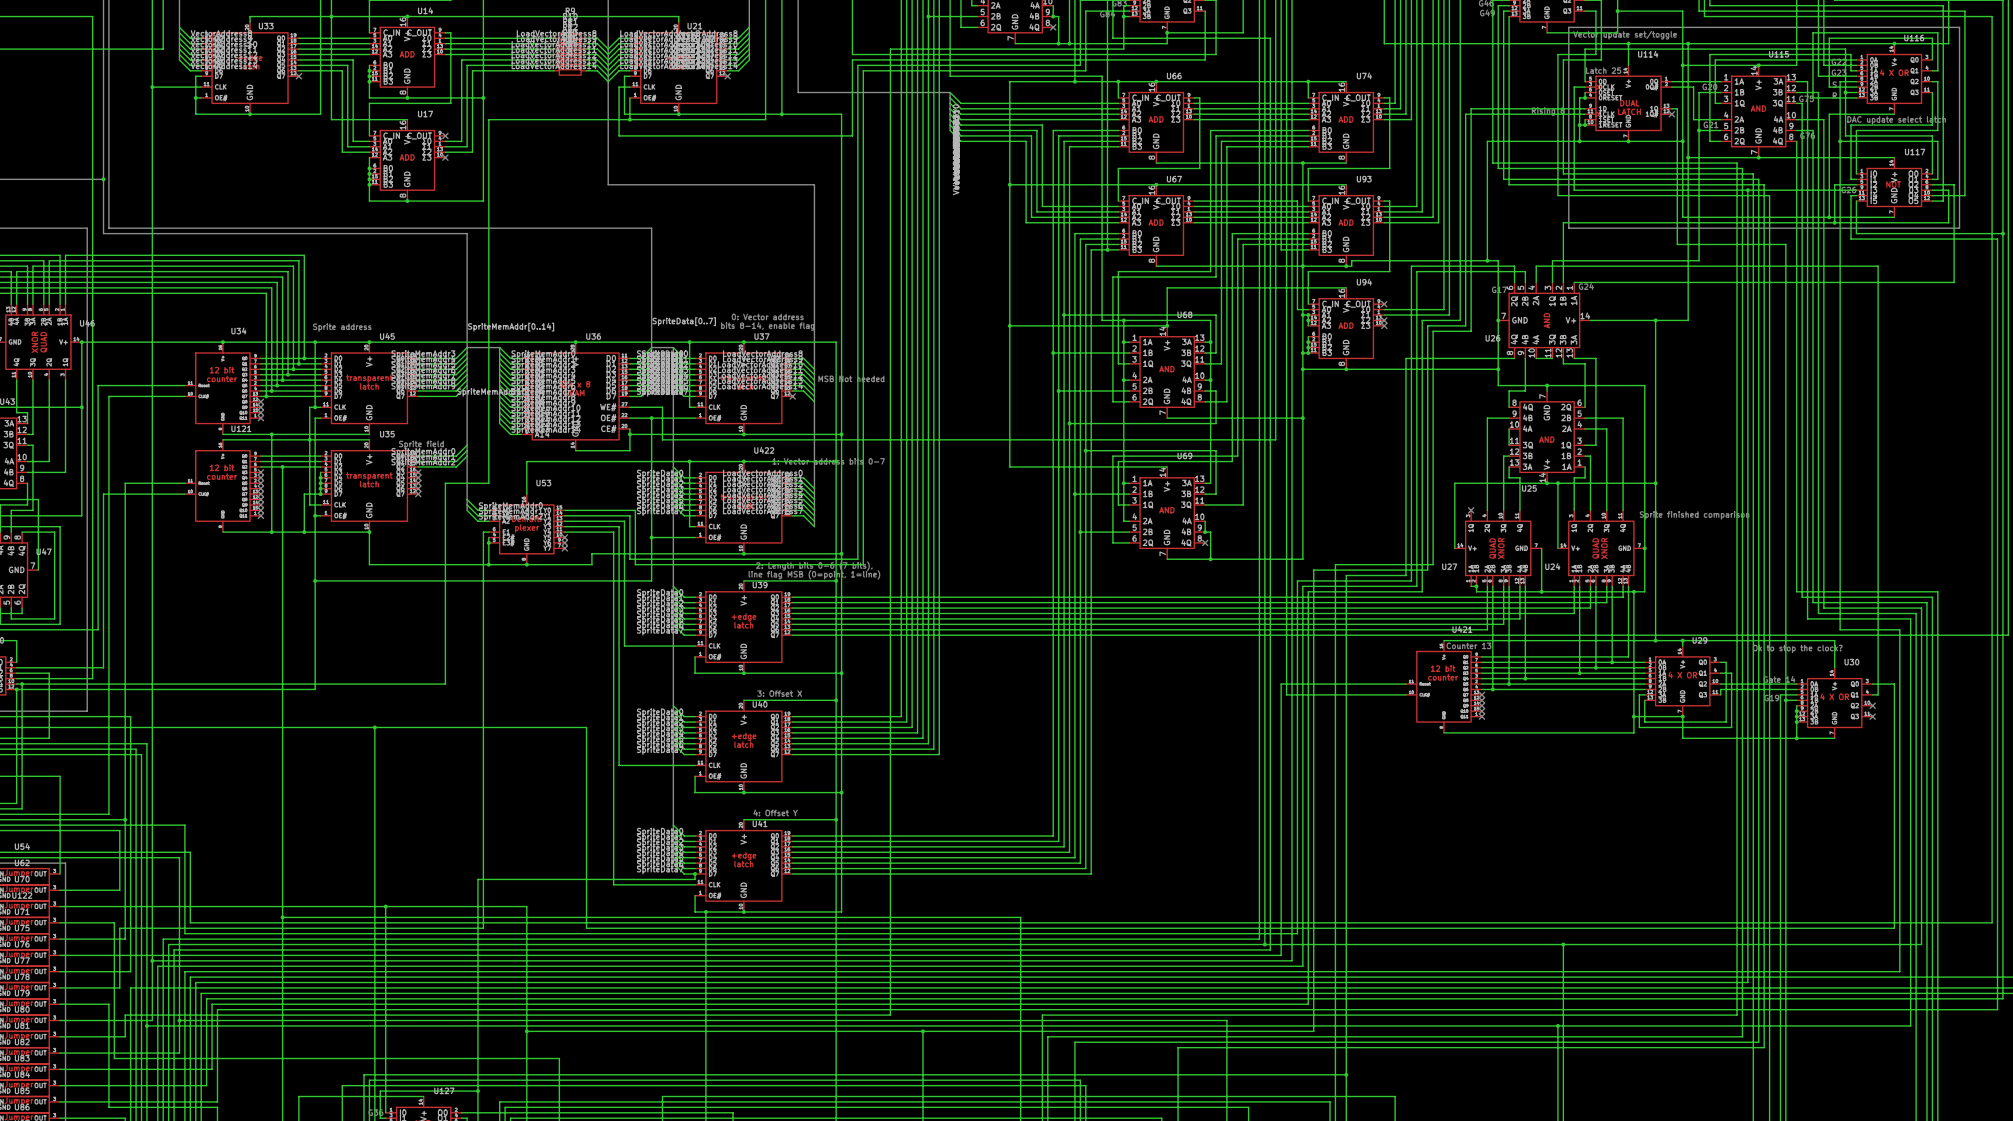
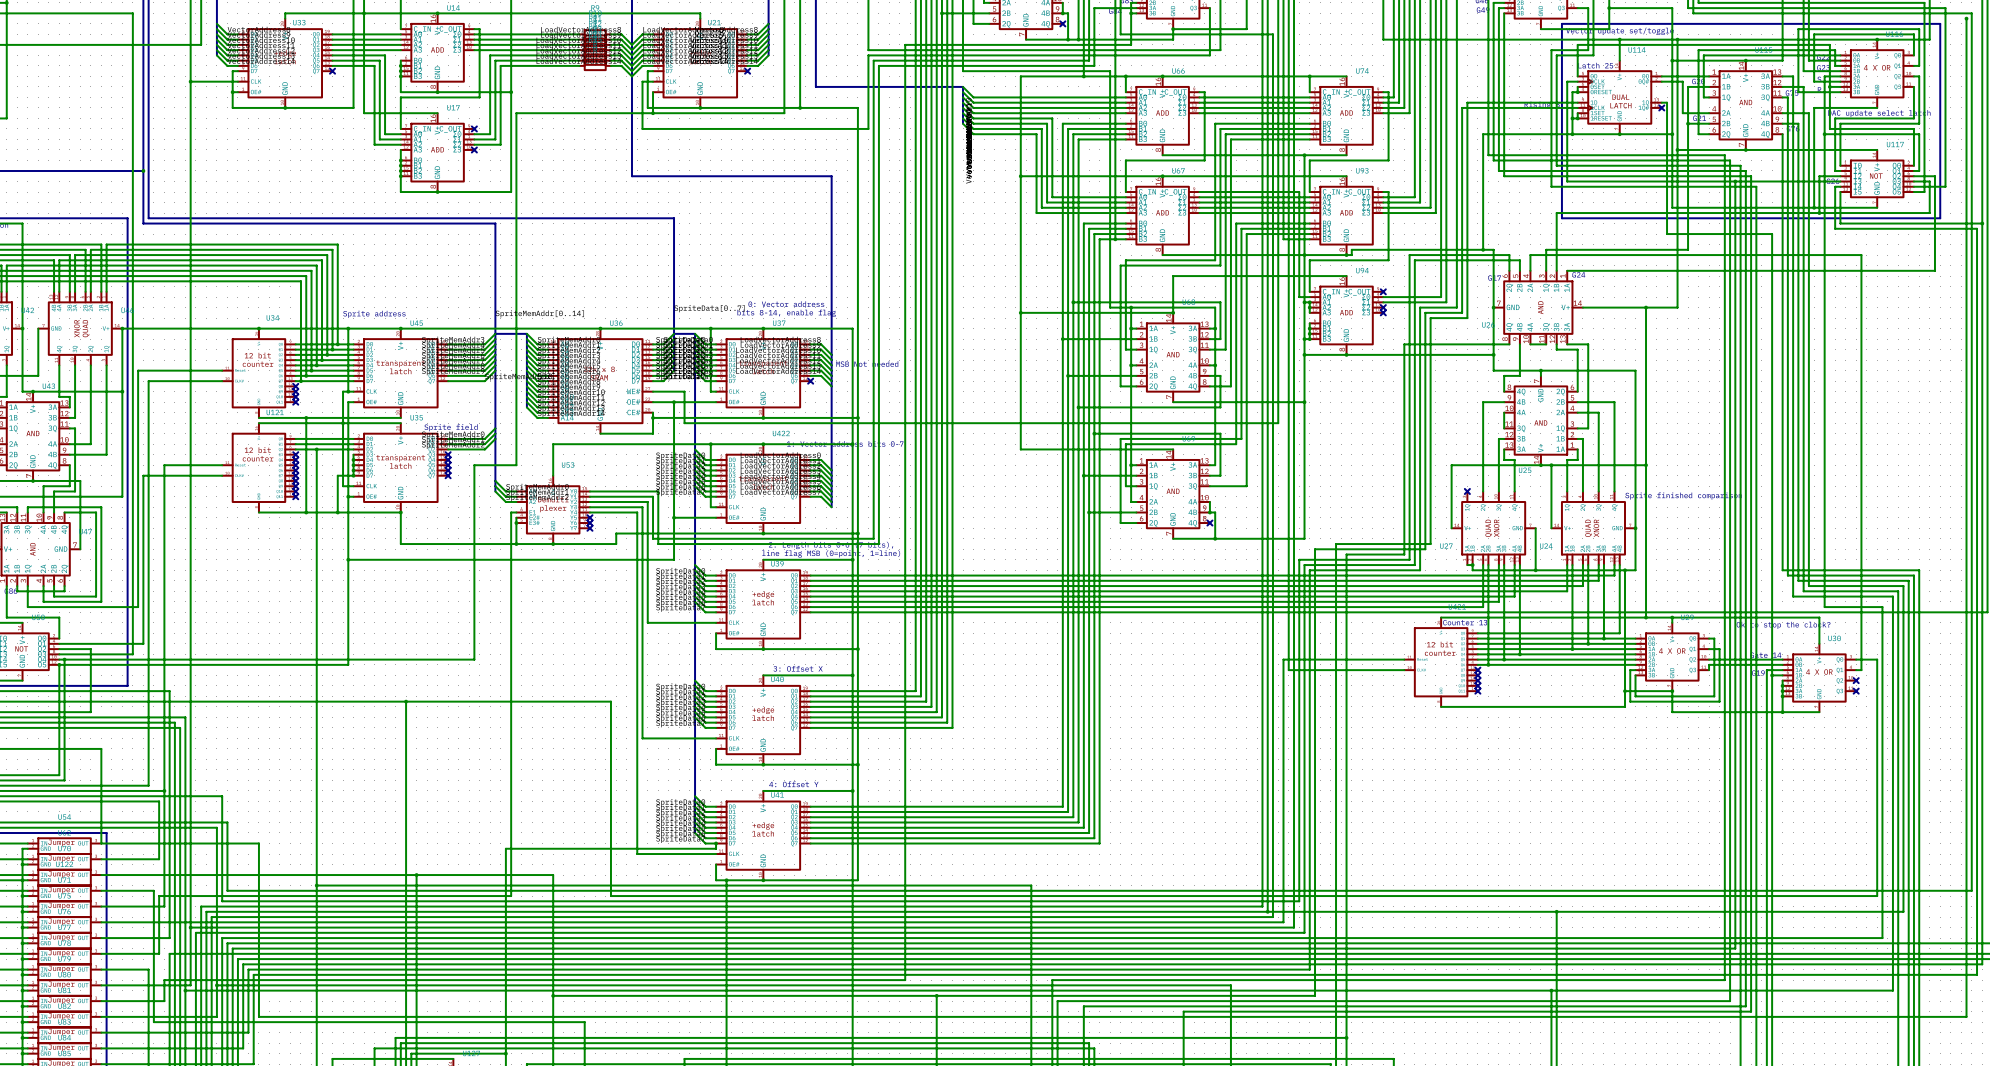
wire: none -> (1966, 18) (1966, 1016) (258, 1016) (258, 843) (101, 843)
junction: none -> (1966, 18)

